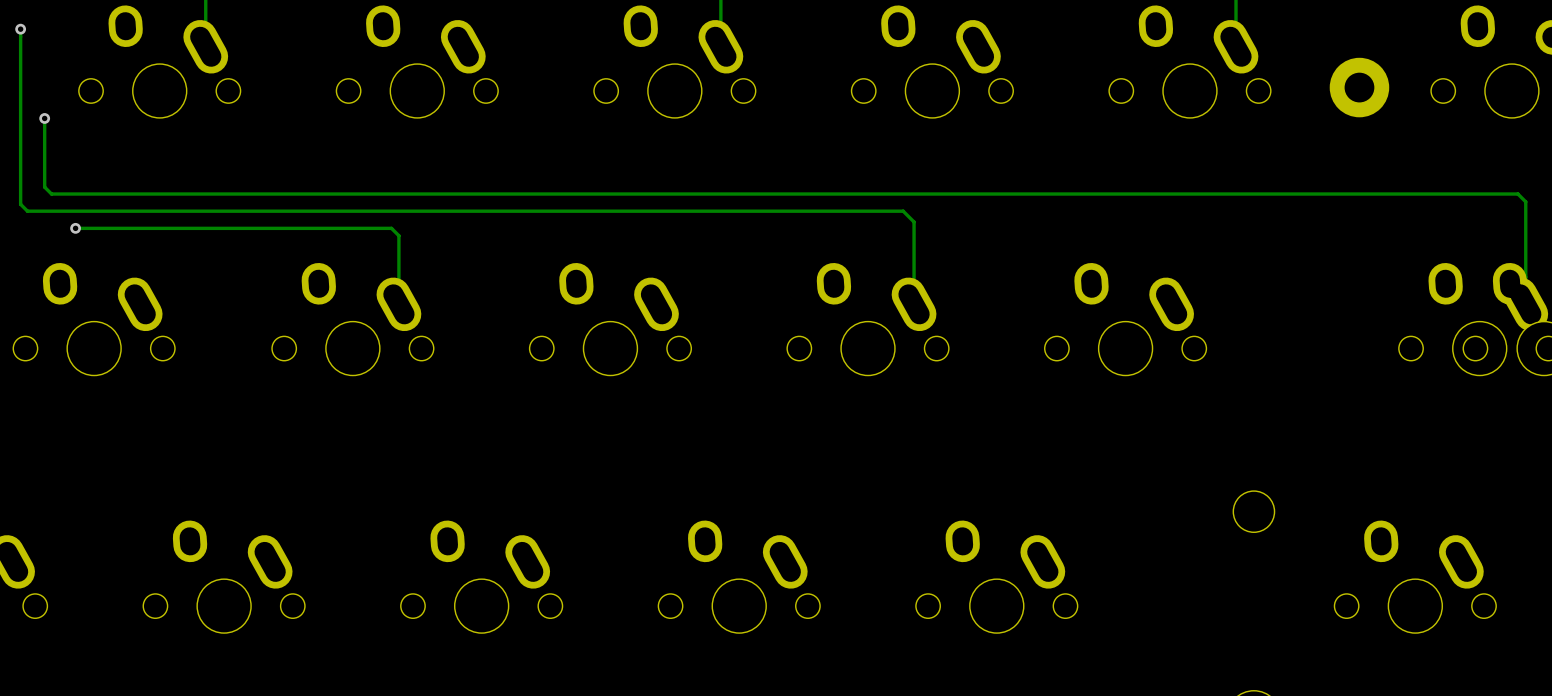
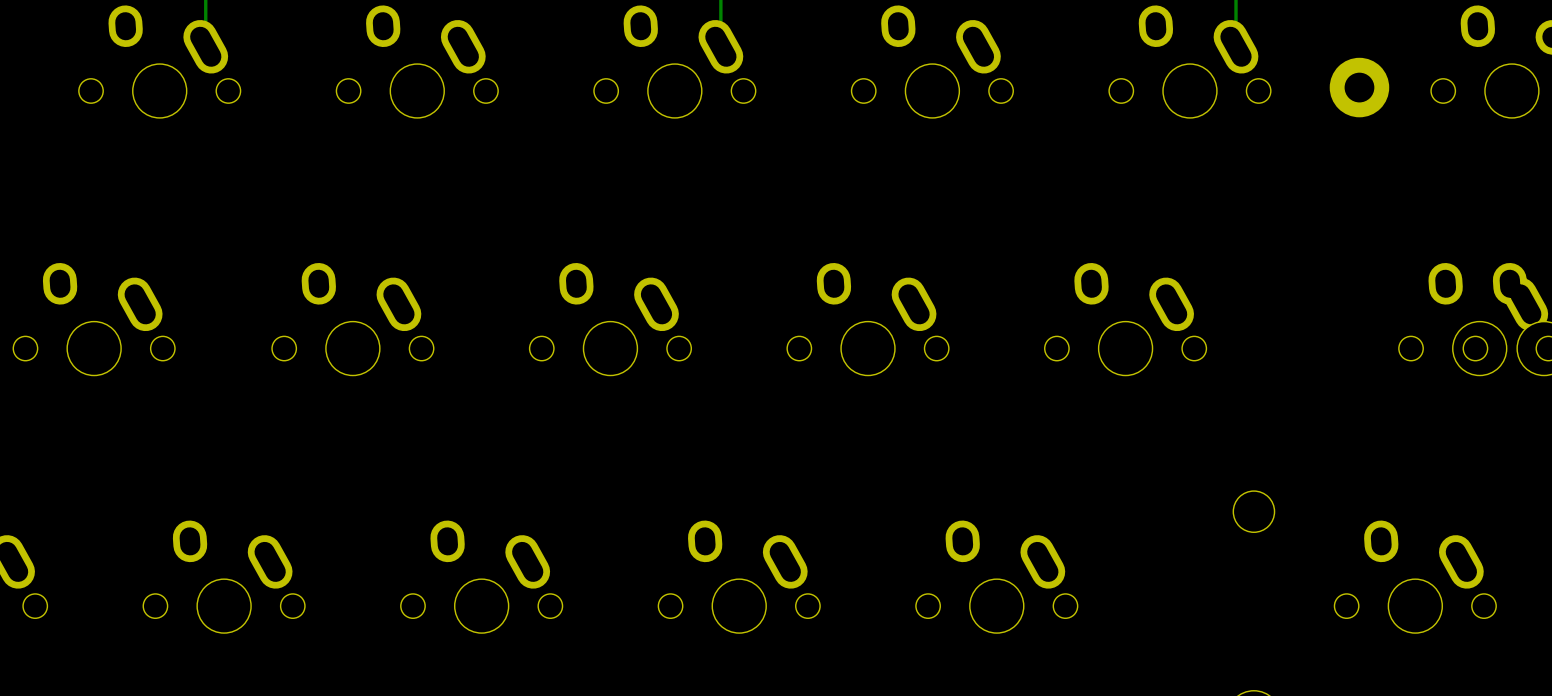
track: (20, 29) (20, 204) (27, 211) (903, 211) (914, 222) (914, 304) -> none
via: (20, 29) -> none
track: (44, 118) (44, 187) (51, 194) (1517, 194) (1525, 201) (1525, 304) -> none
via: (44, 118) -> none
track: (75, 228) (391, 228) (398, 235) (398, 304) -> none
via: (75, 228) -> none

